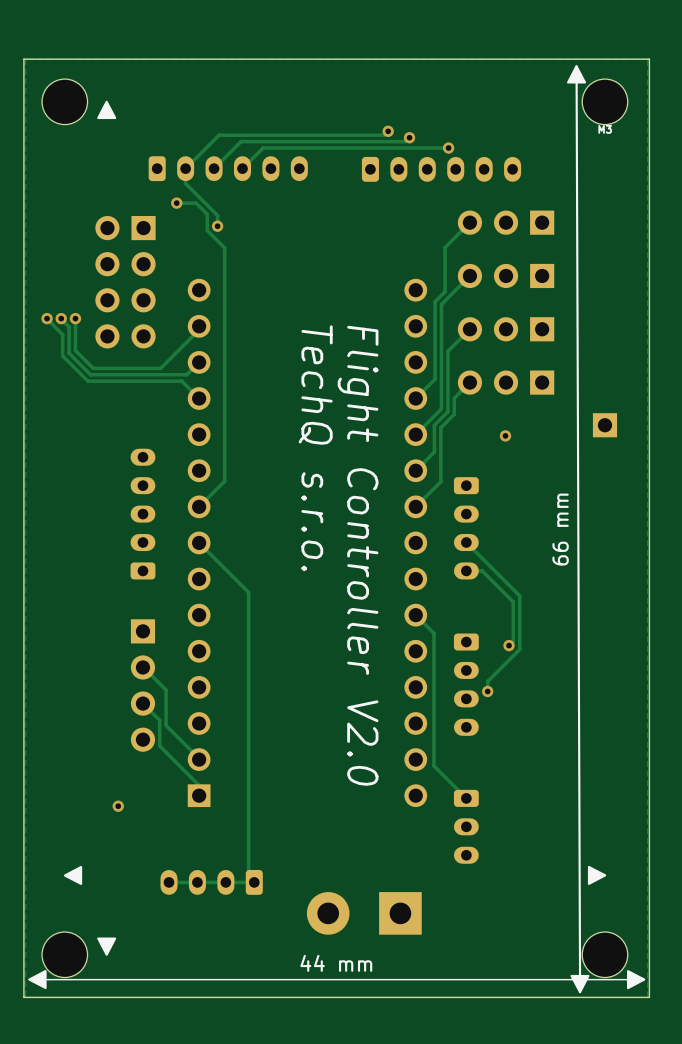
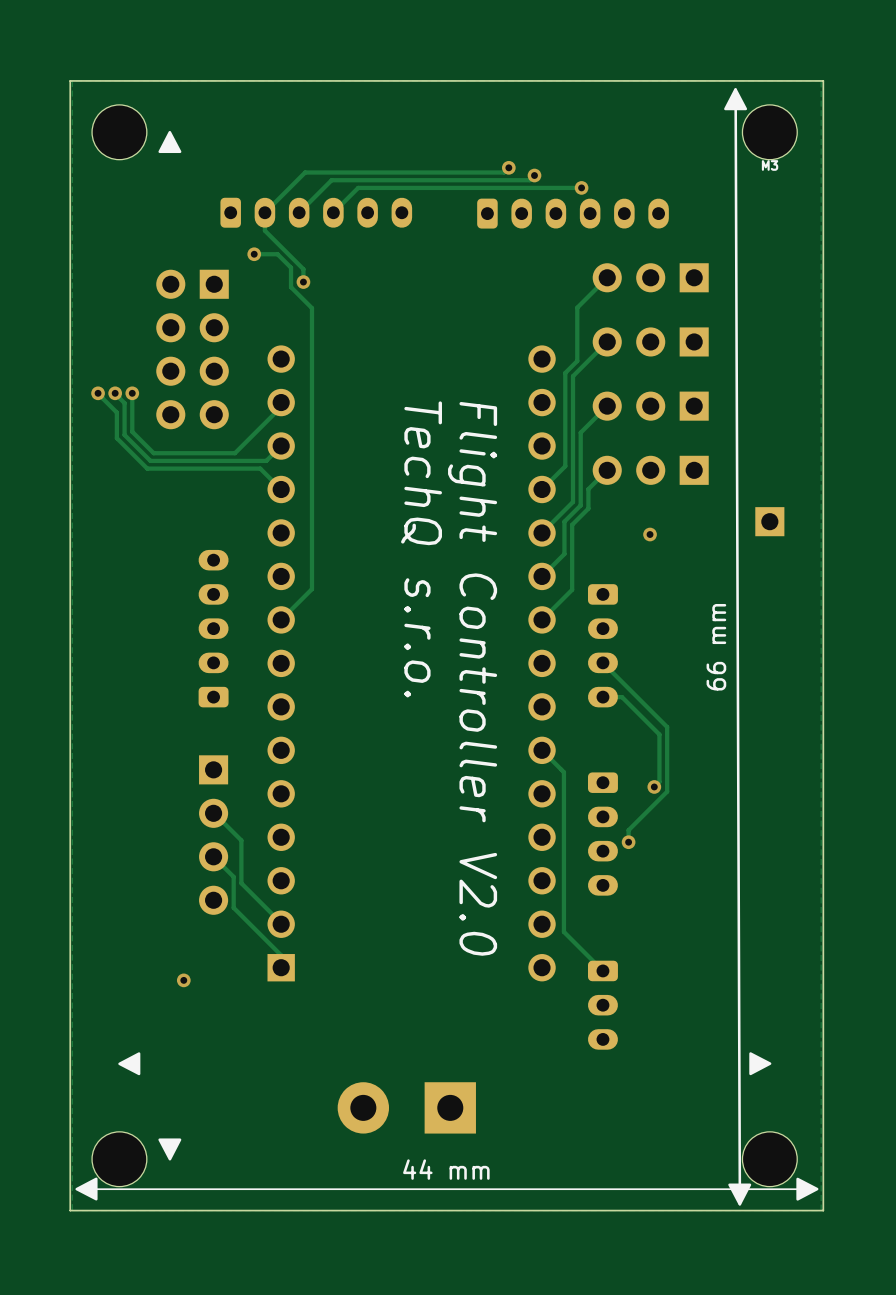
track: (199, 542) (248, 592) (248, 876) (254, 882) (168, 882) -> none
part: (211, 882) -> none
part position: (364, 913) -> (406, 1107)

